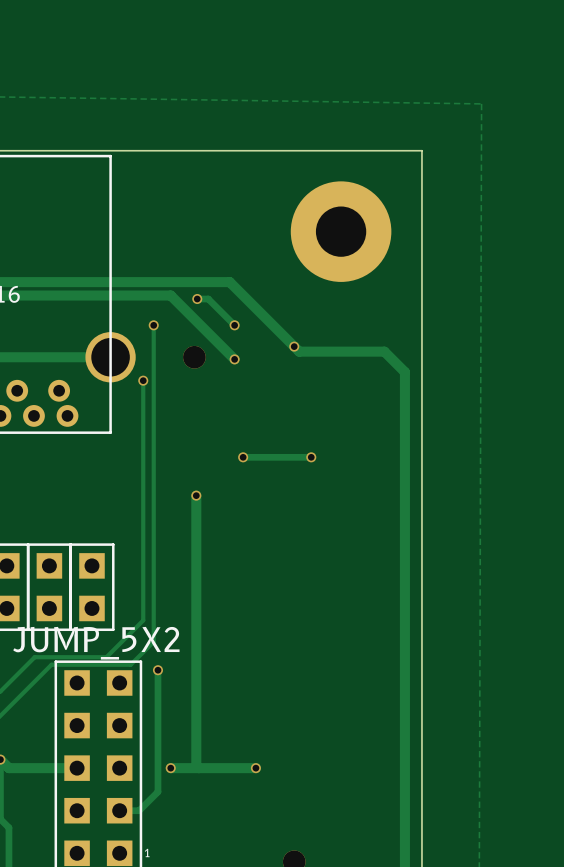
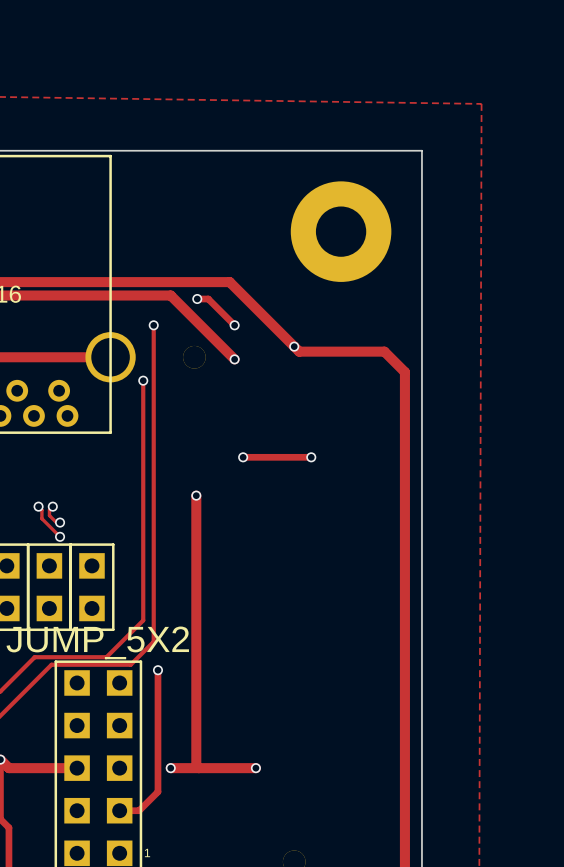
track: none -> (38, 506) (41, 510) (41, 518) (60, 536)
via: none -> (38, 506)
track: none -> (52, 506) (49, 510) (49, 515) (56, 522) (60, 522)
via: none -> (52, 506)
via: none -> (60, 522)
via: none -> (60, 536)

